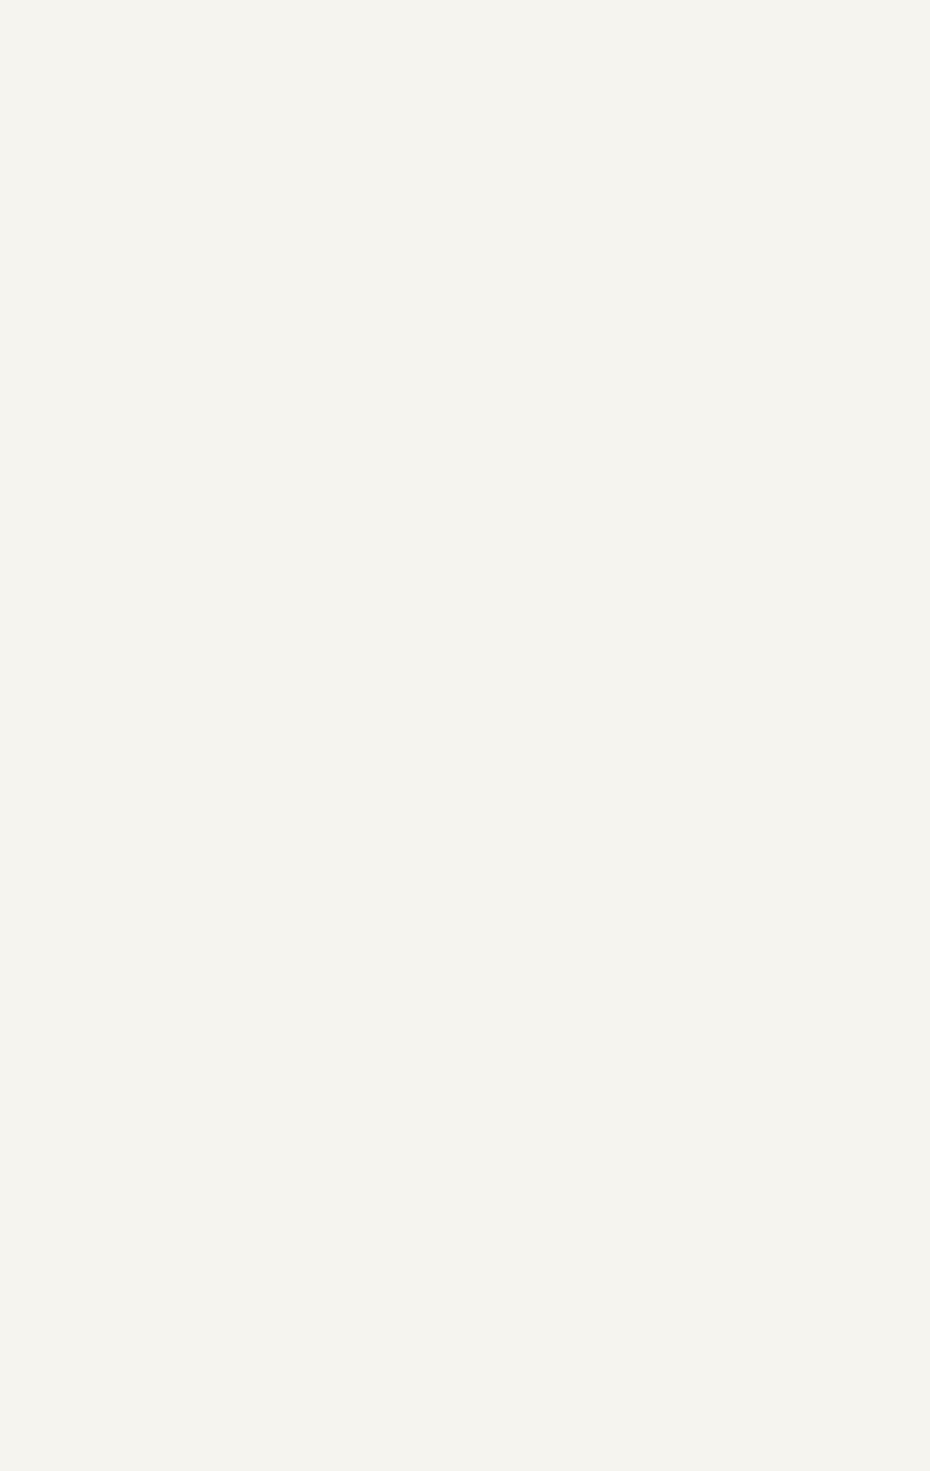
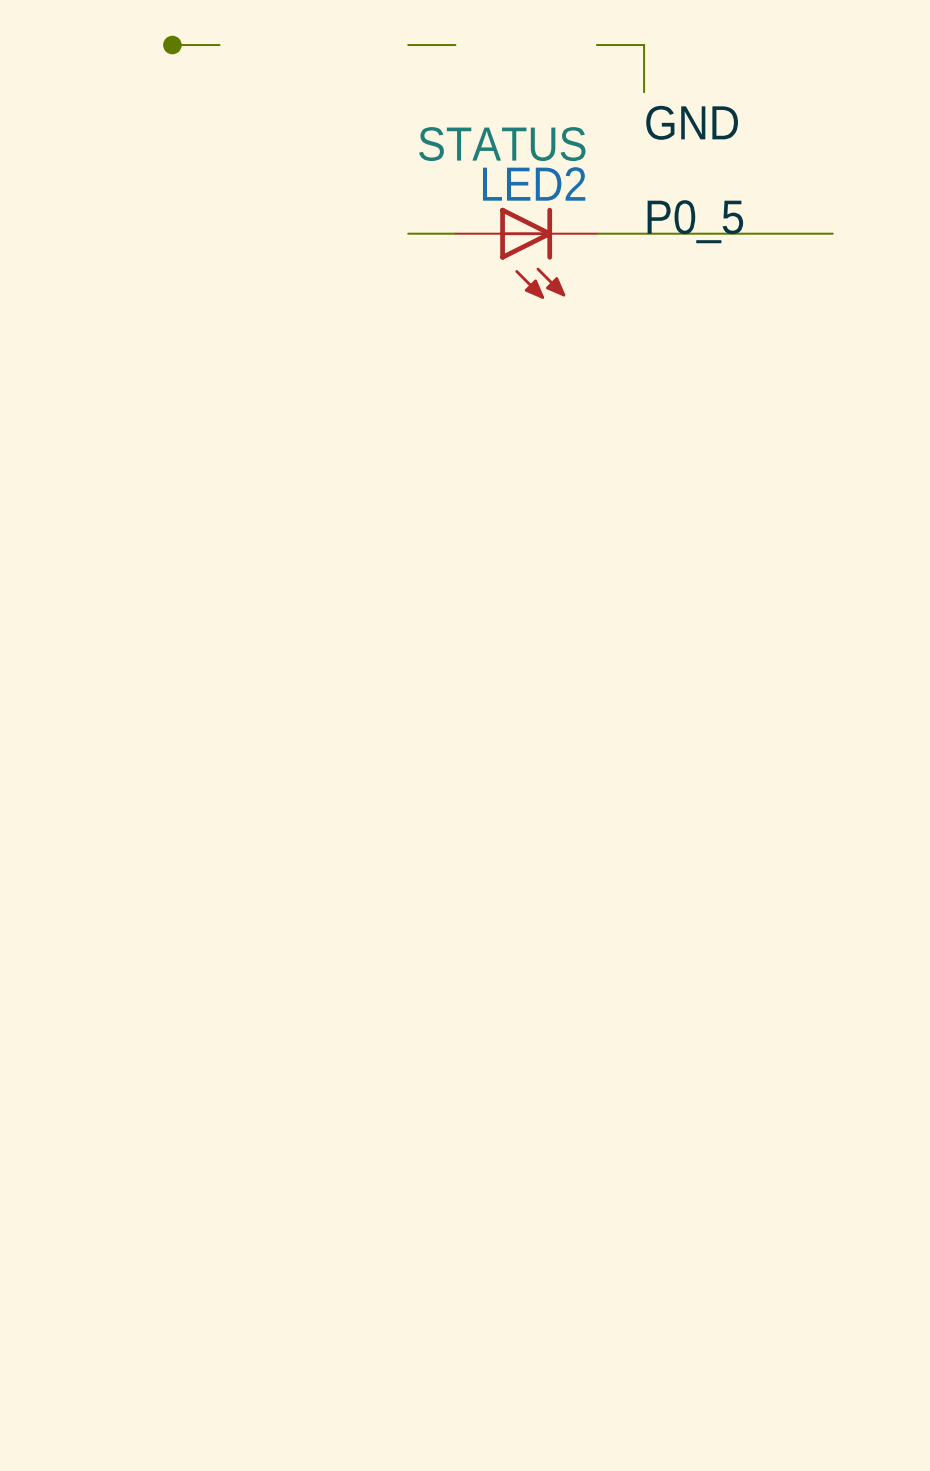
wire: none -> (172, 45) (219, 45)
junction: none -> (172, 45)
wire: none -> (408, 45) (455, 45)
wire: none -> (596, 45) (644, 45) (644, 92)
label: none -> GND (692, 122)
label: none -> P0_5 (695, 221)
wire: none -> (408, 233) (455, 233)
wire: none -> (596, 233) (832, 233)
LED2: none -> STATUS (526, 253)

